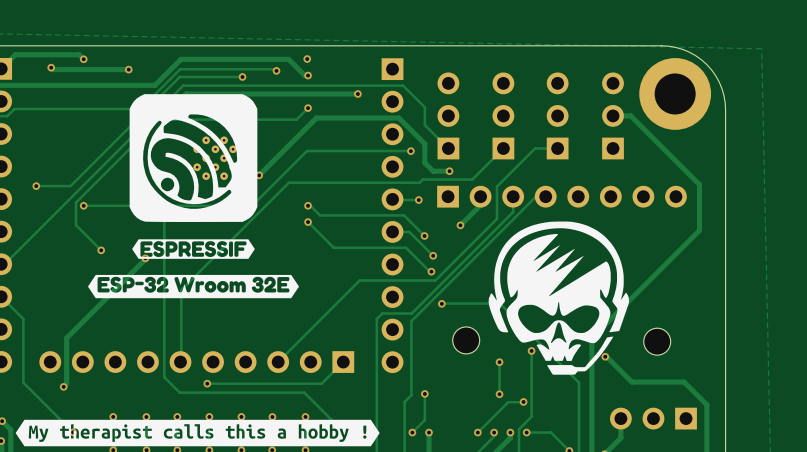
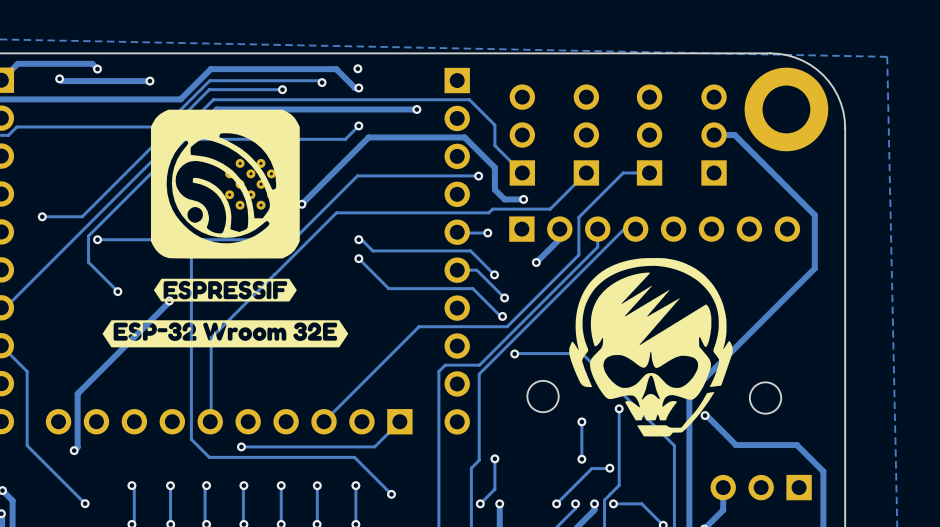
drawing: [15, 419, 380, 447] -> none

